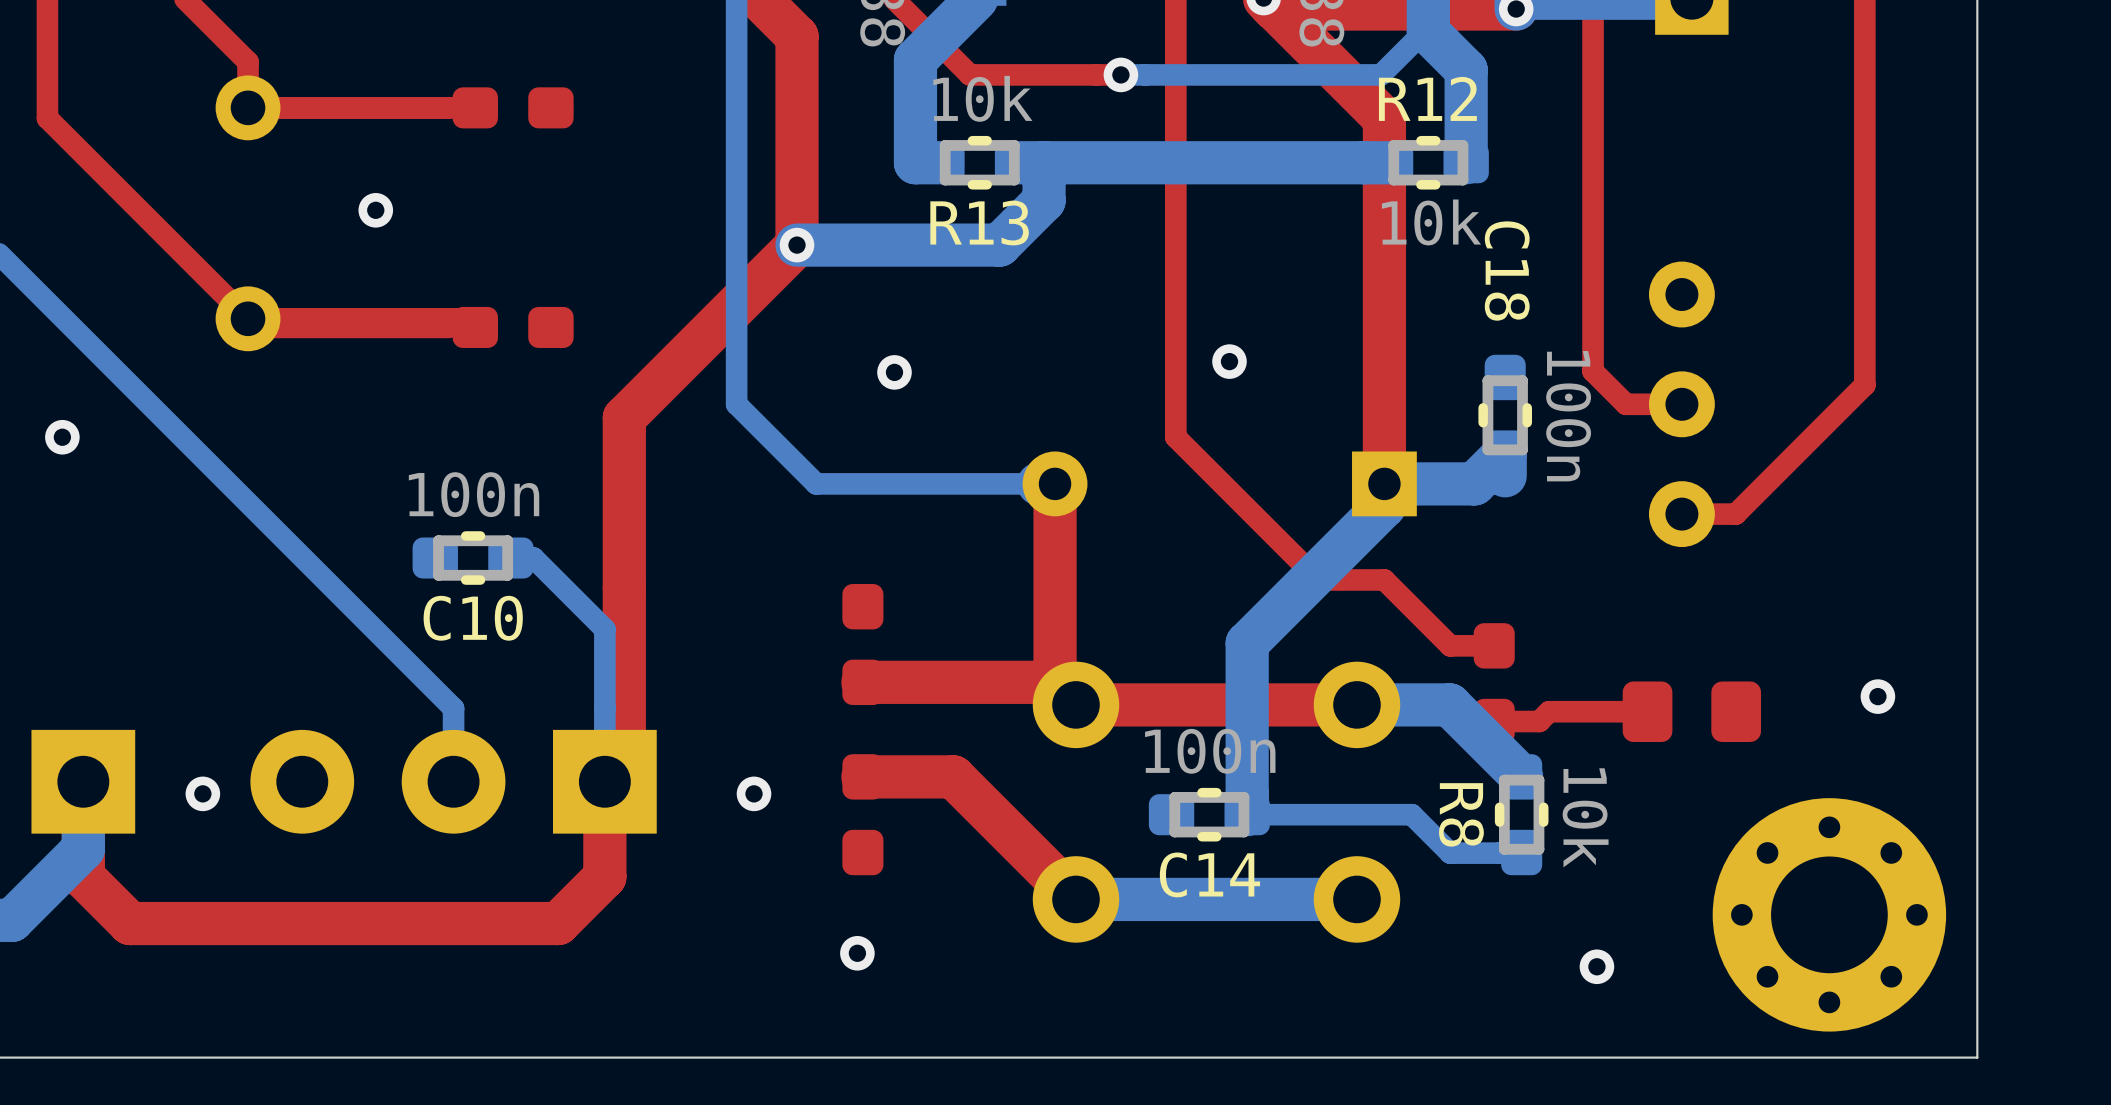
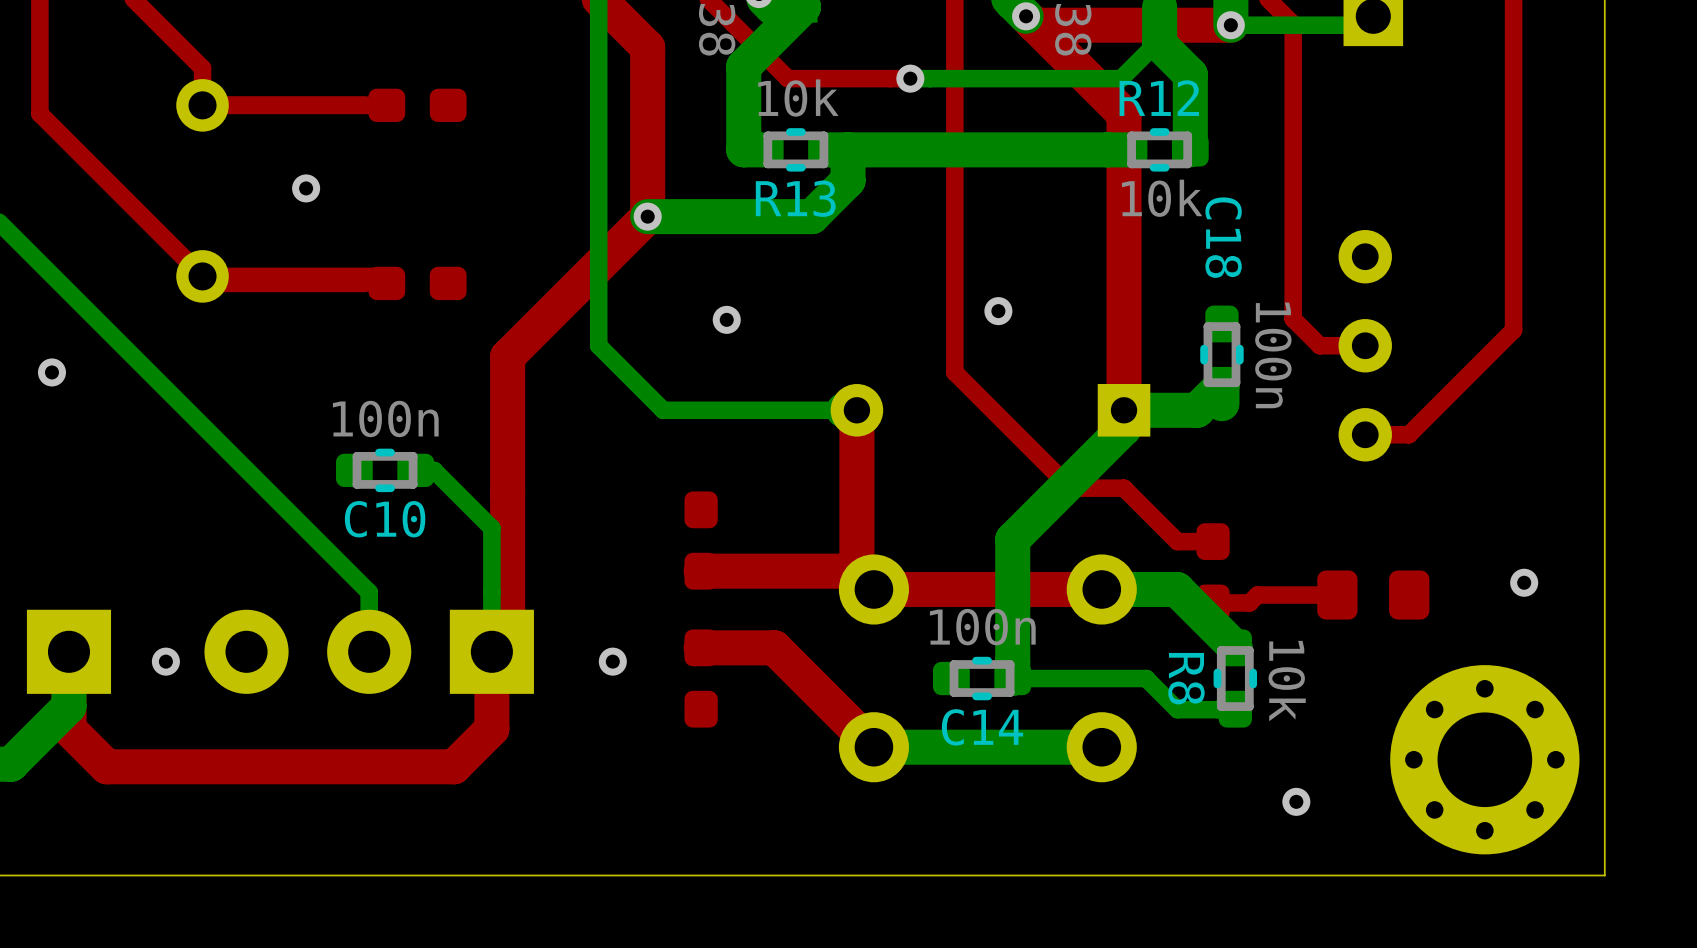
via: (857, 953) -> none

